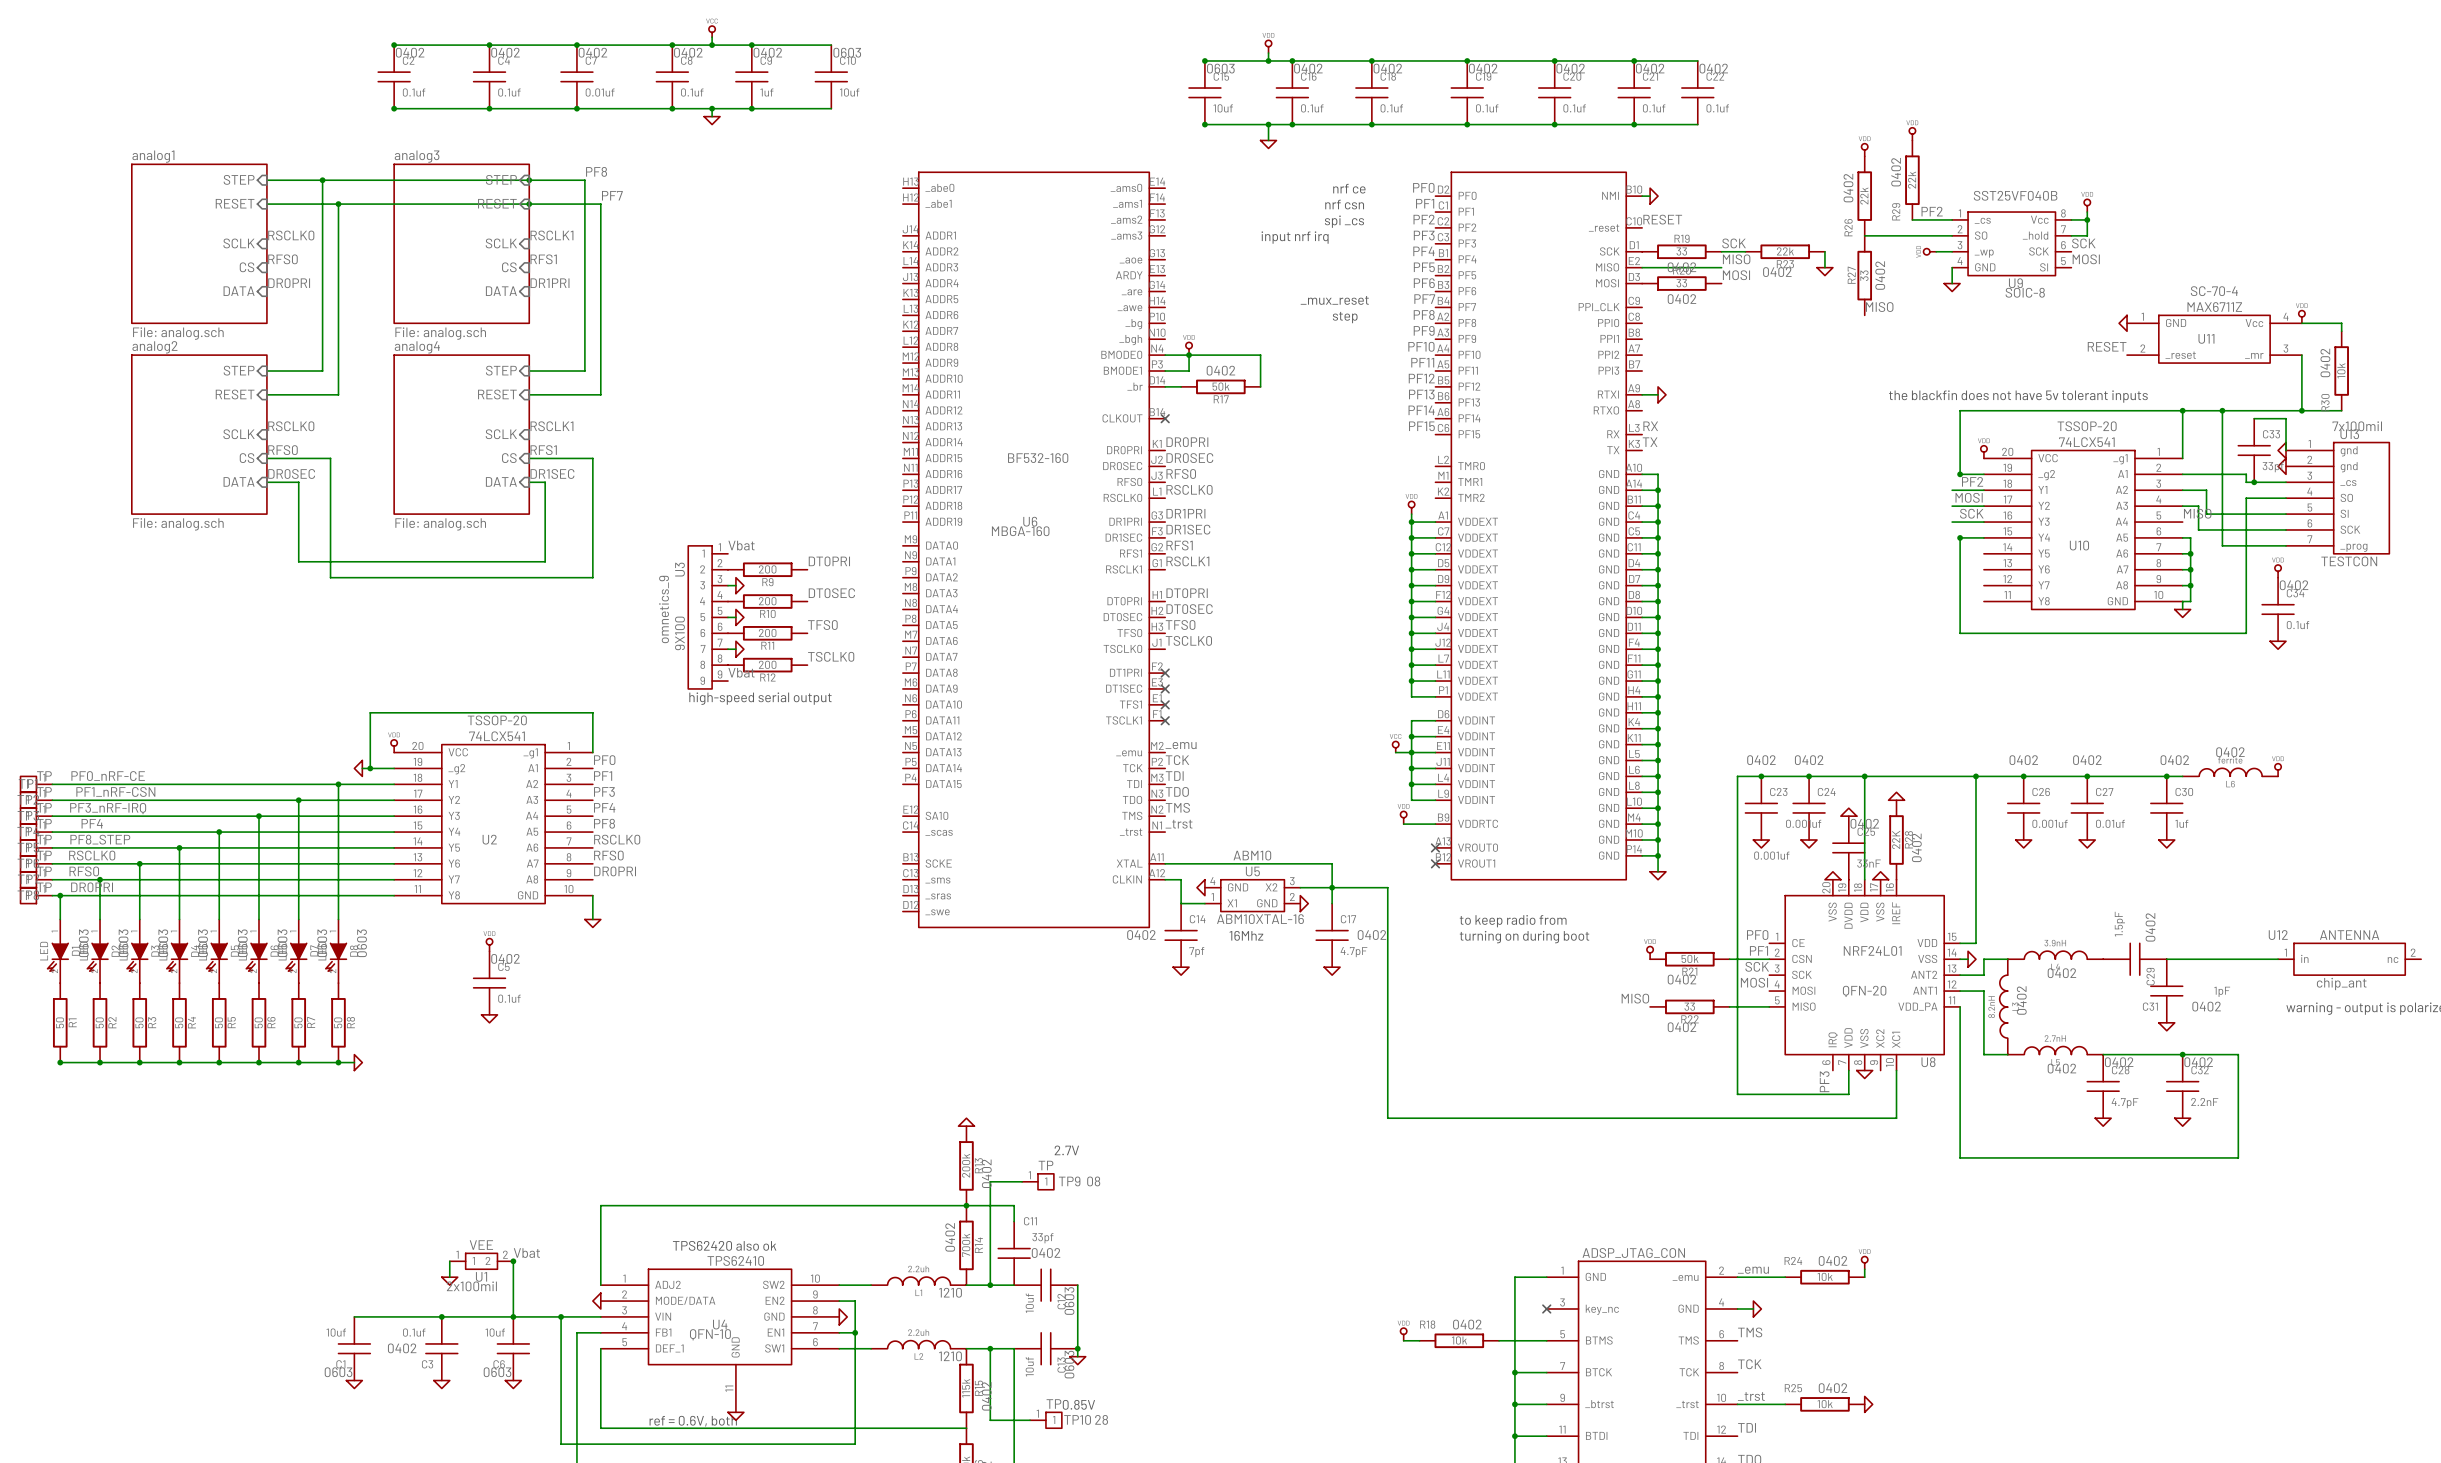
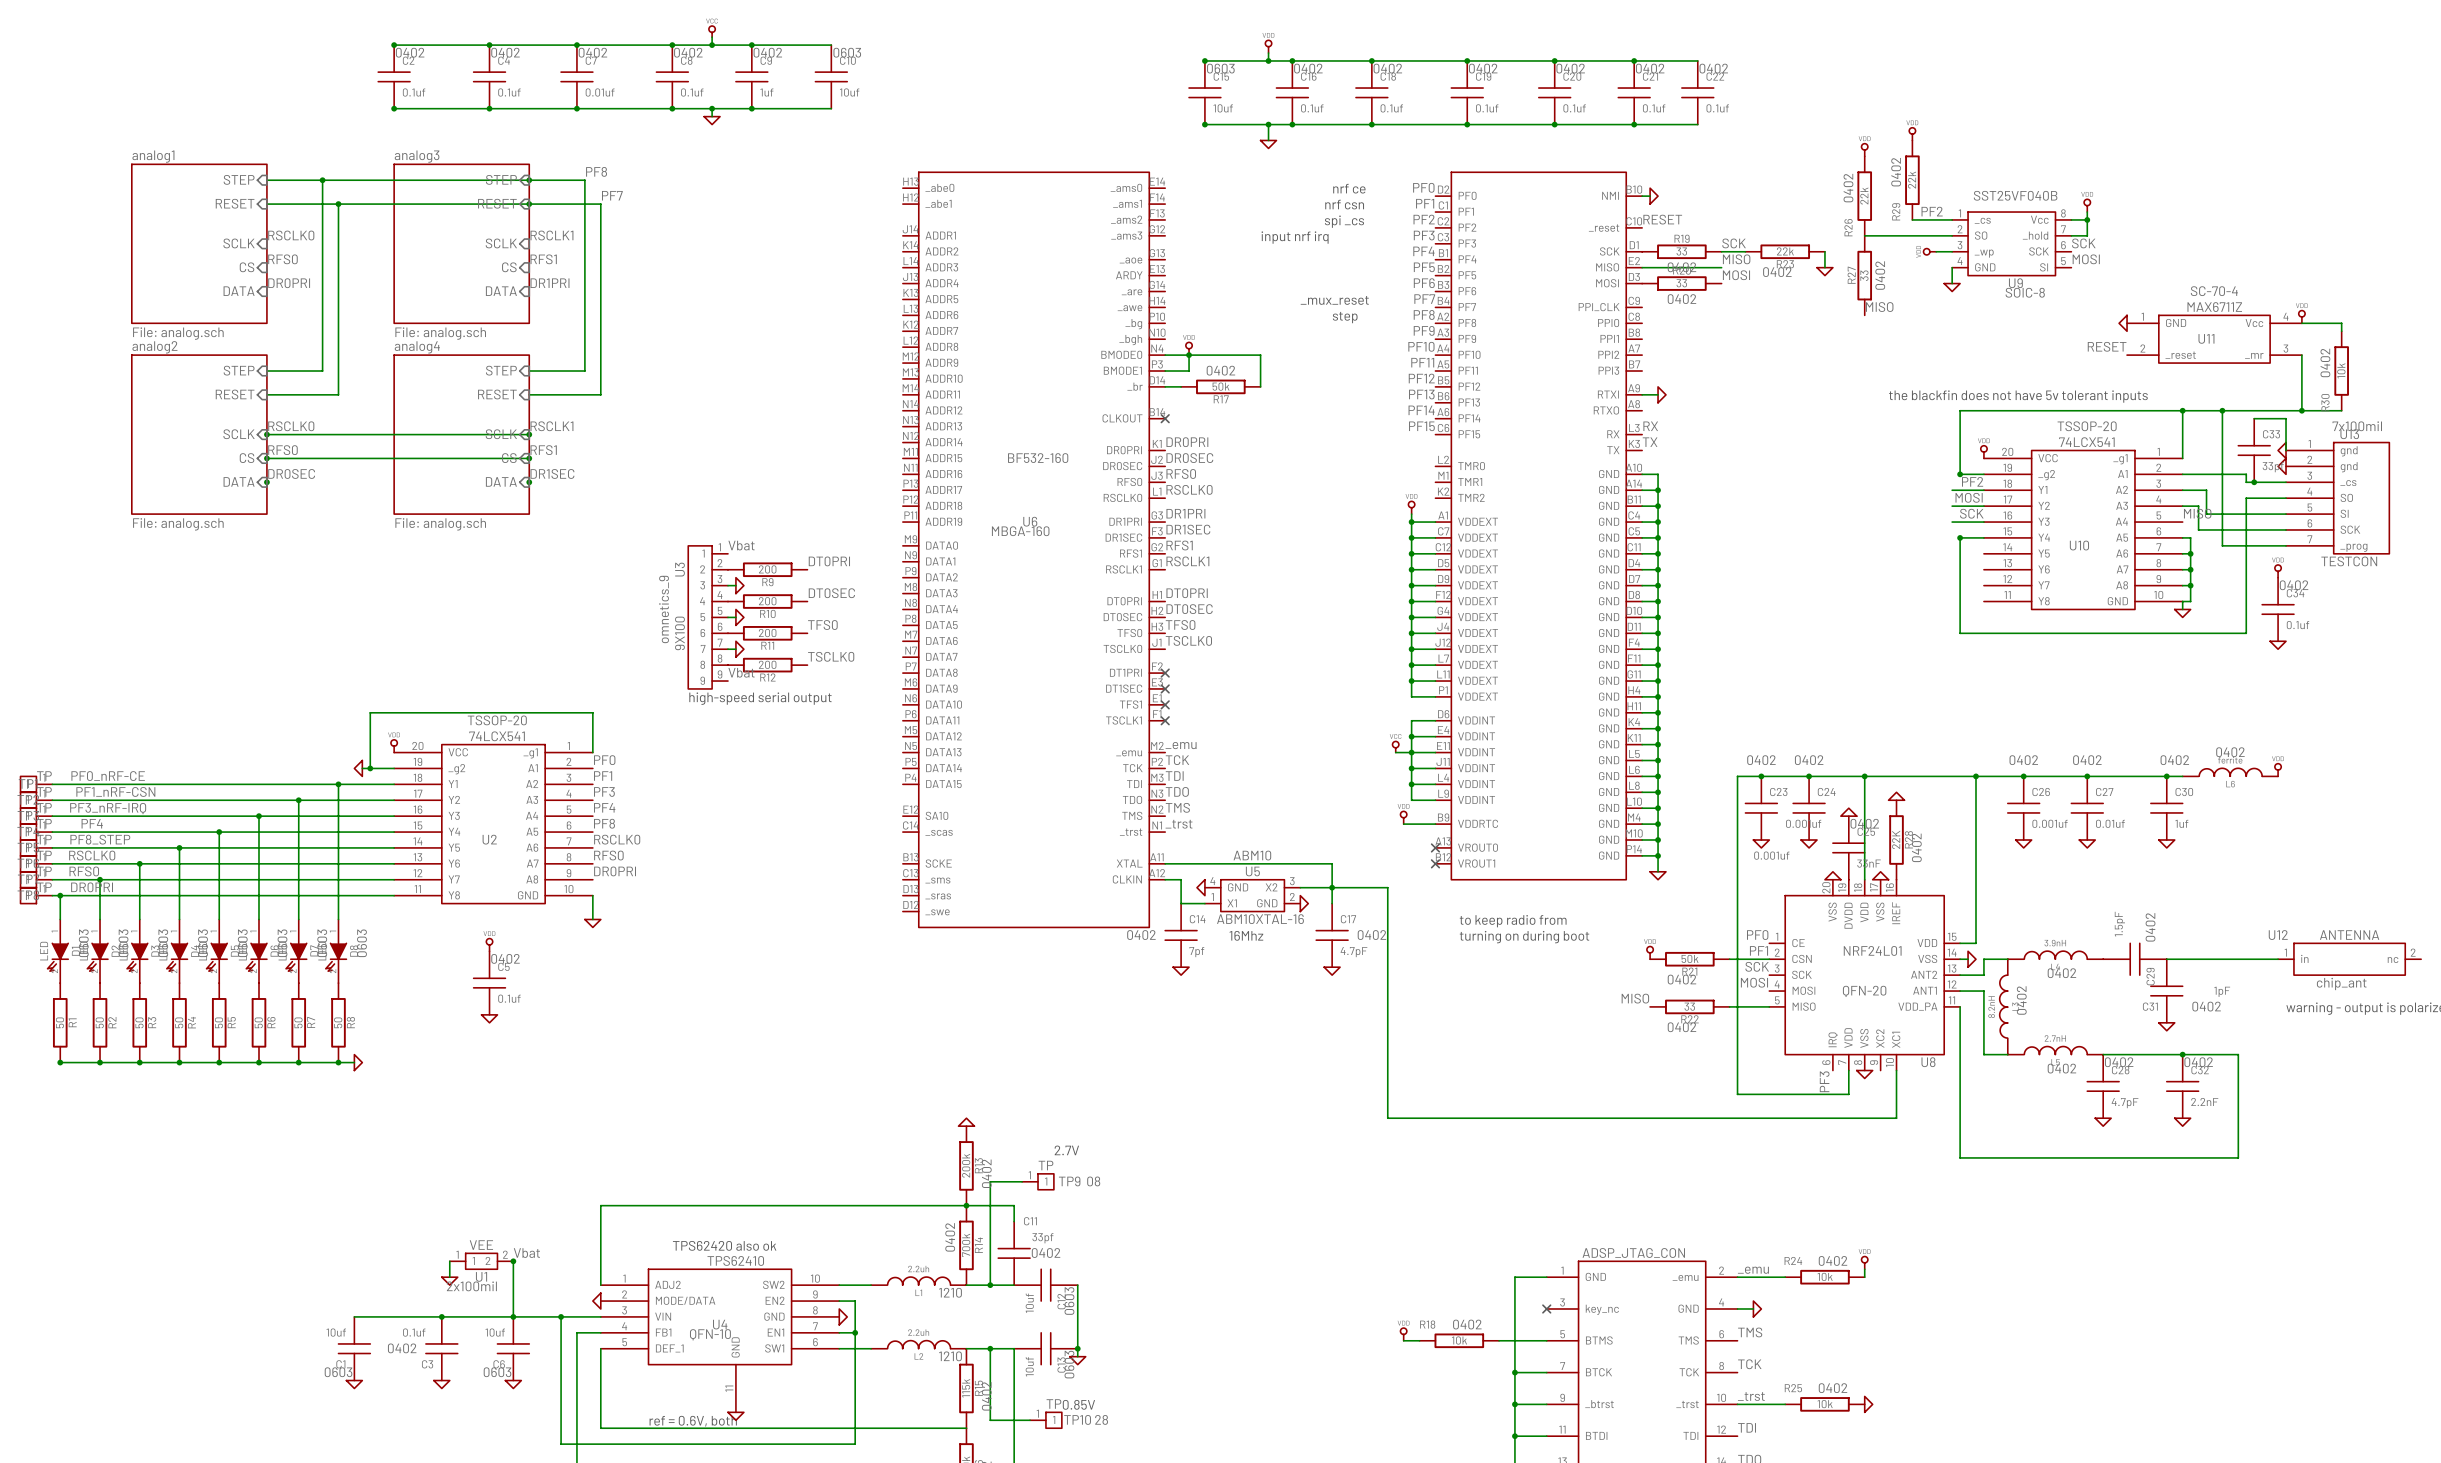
wire: none -> (266, 434) (529, 434)
junction: none -> (266, 434)
junction: none -> (529, 434)
junction: none -> (266, 458)
wire: (330, 458) (330, 577) (592, 577) (592, 458) (529, 458) -> (330, 458) (529, 458)
junction: none -> (529, 458)
wire: (266, 482) (298, 482) (298, 561) (545, 561) (545, 482) (529, 482) -> none
junction: none -> (266, 482)
junction: none -> (529, 482)

